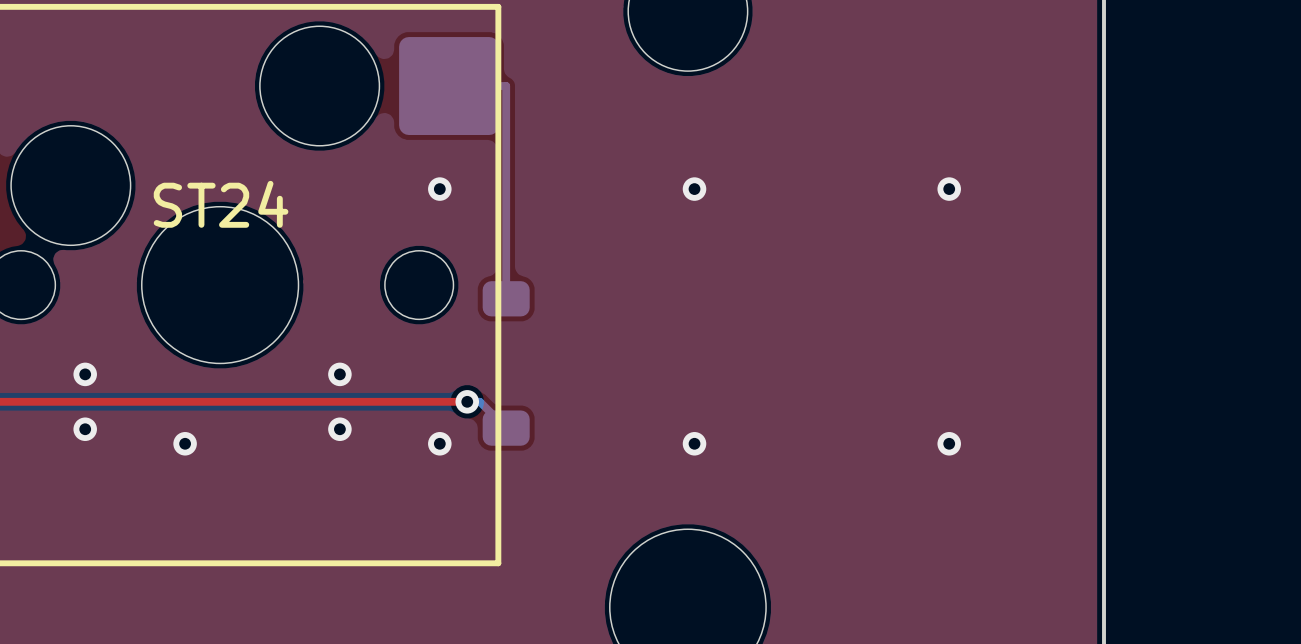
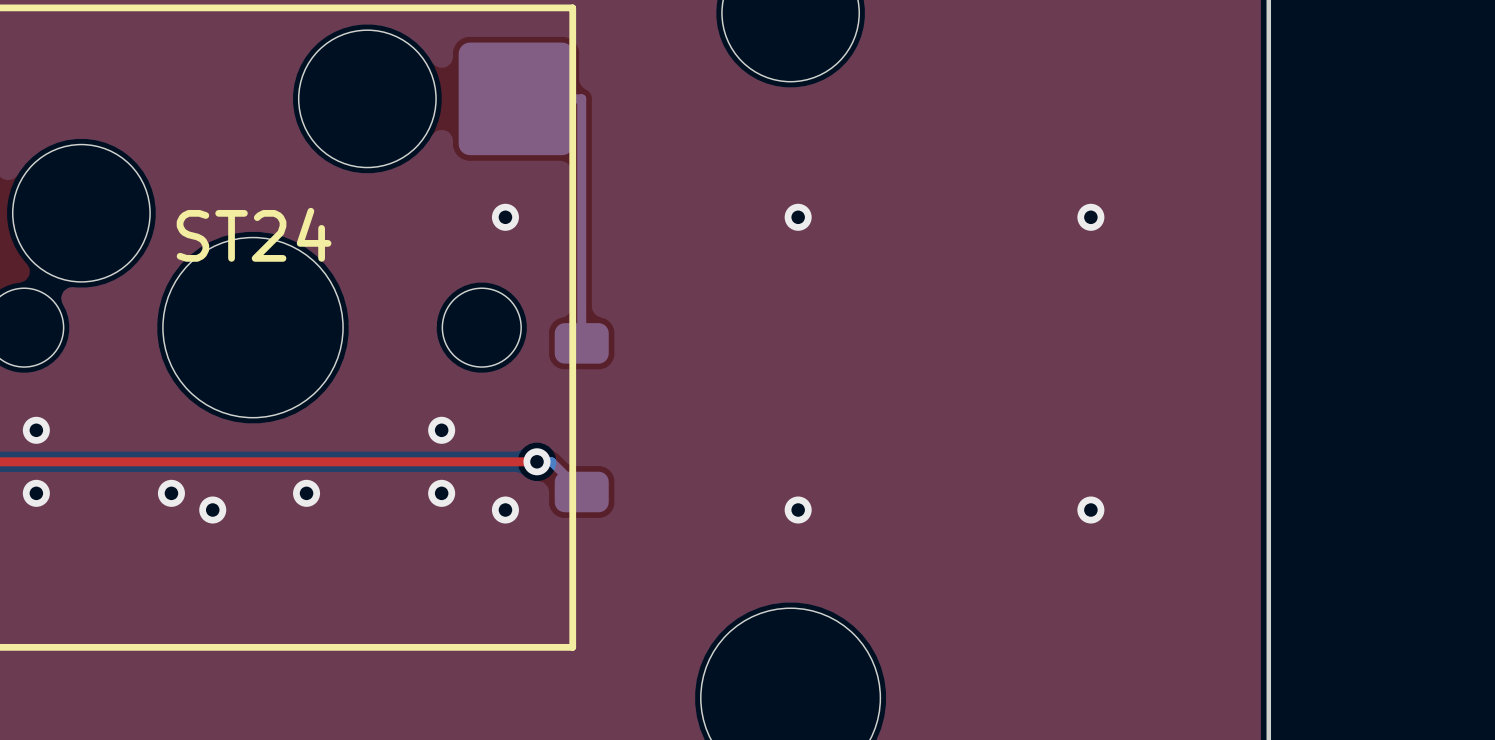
via: none -> (36, 430)
via: (85, 374) -> none
via: (339, 374) -> none
via: none -> (441, 430)
via: none -> (36, 493)
via: (85, 429) -> none
via: none -> (171, 493)
via: none -> (306, 493)
via: (339, 429) -> none
via: none -> (441, 493)

